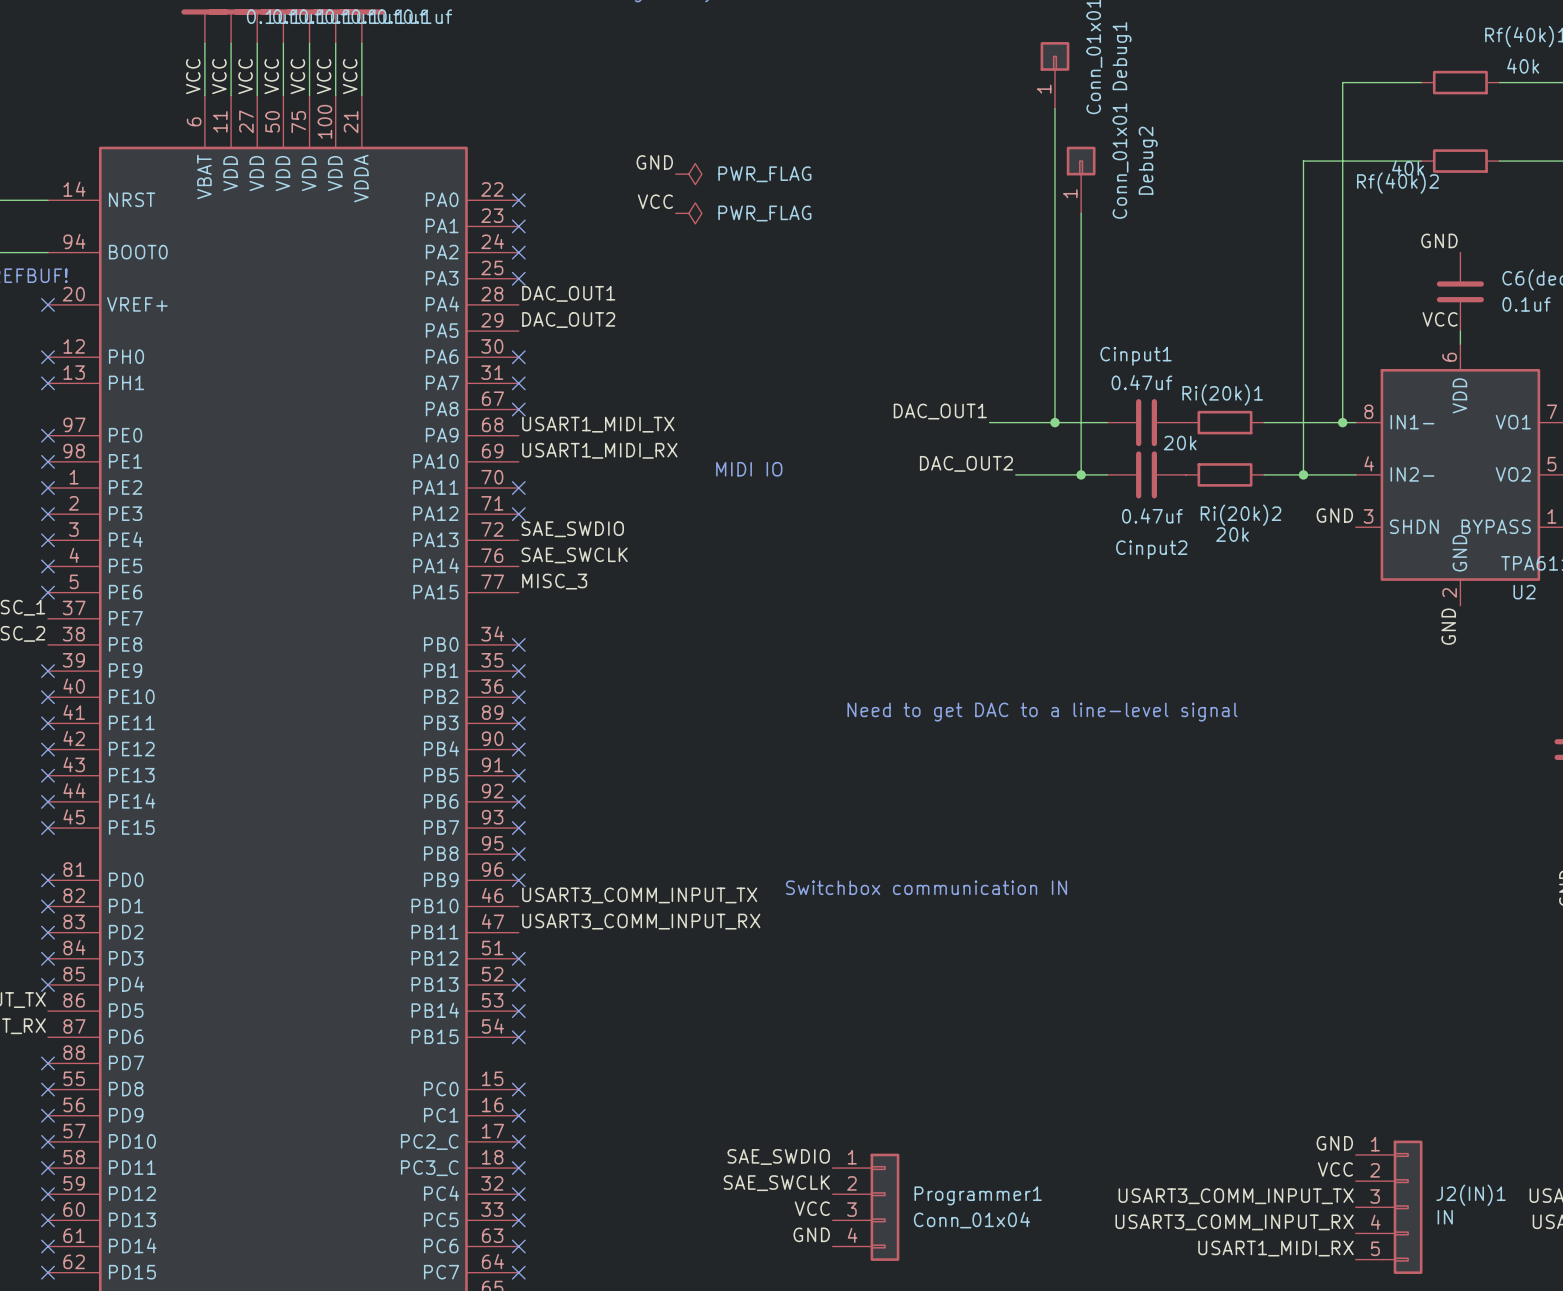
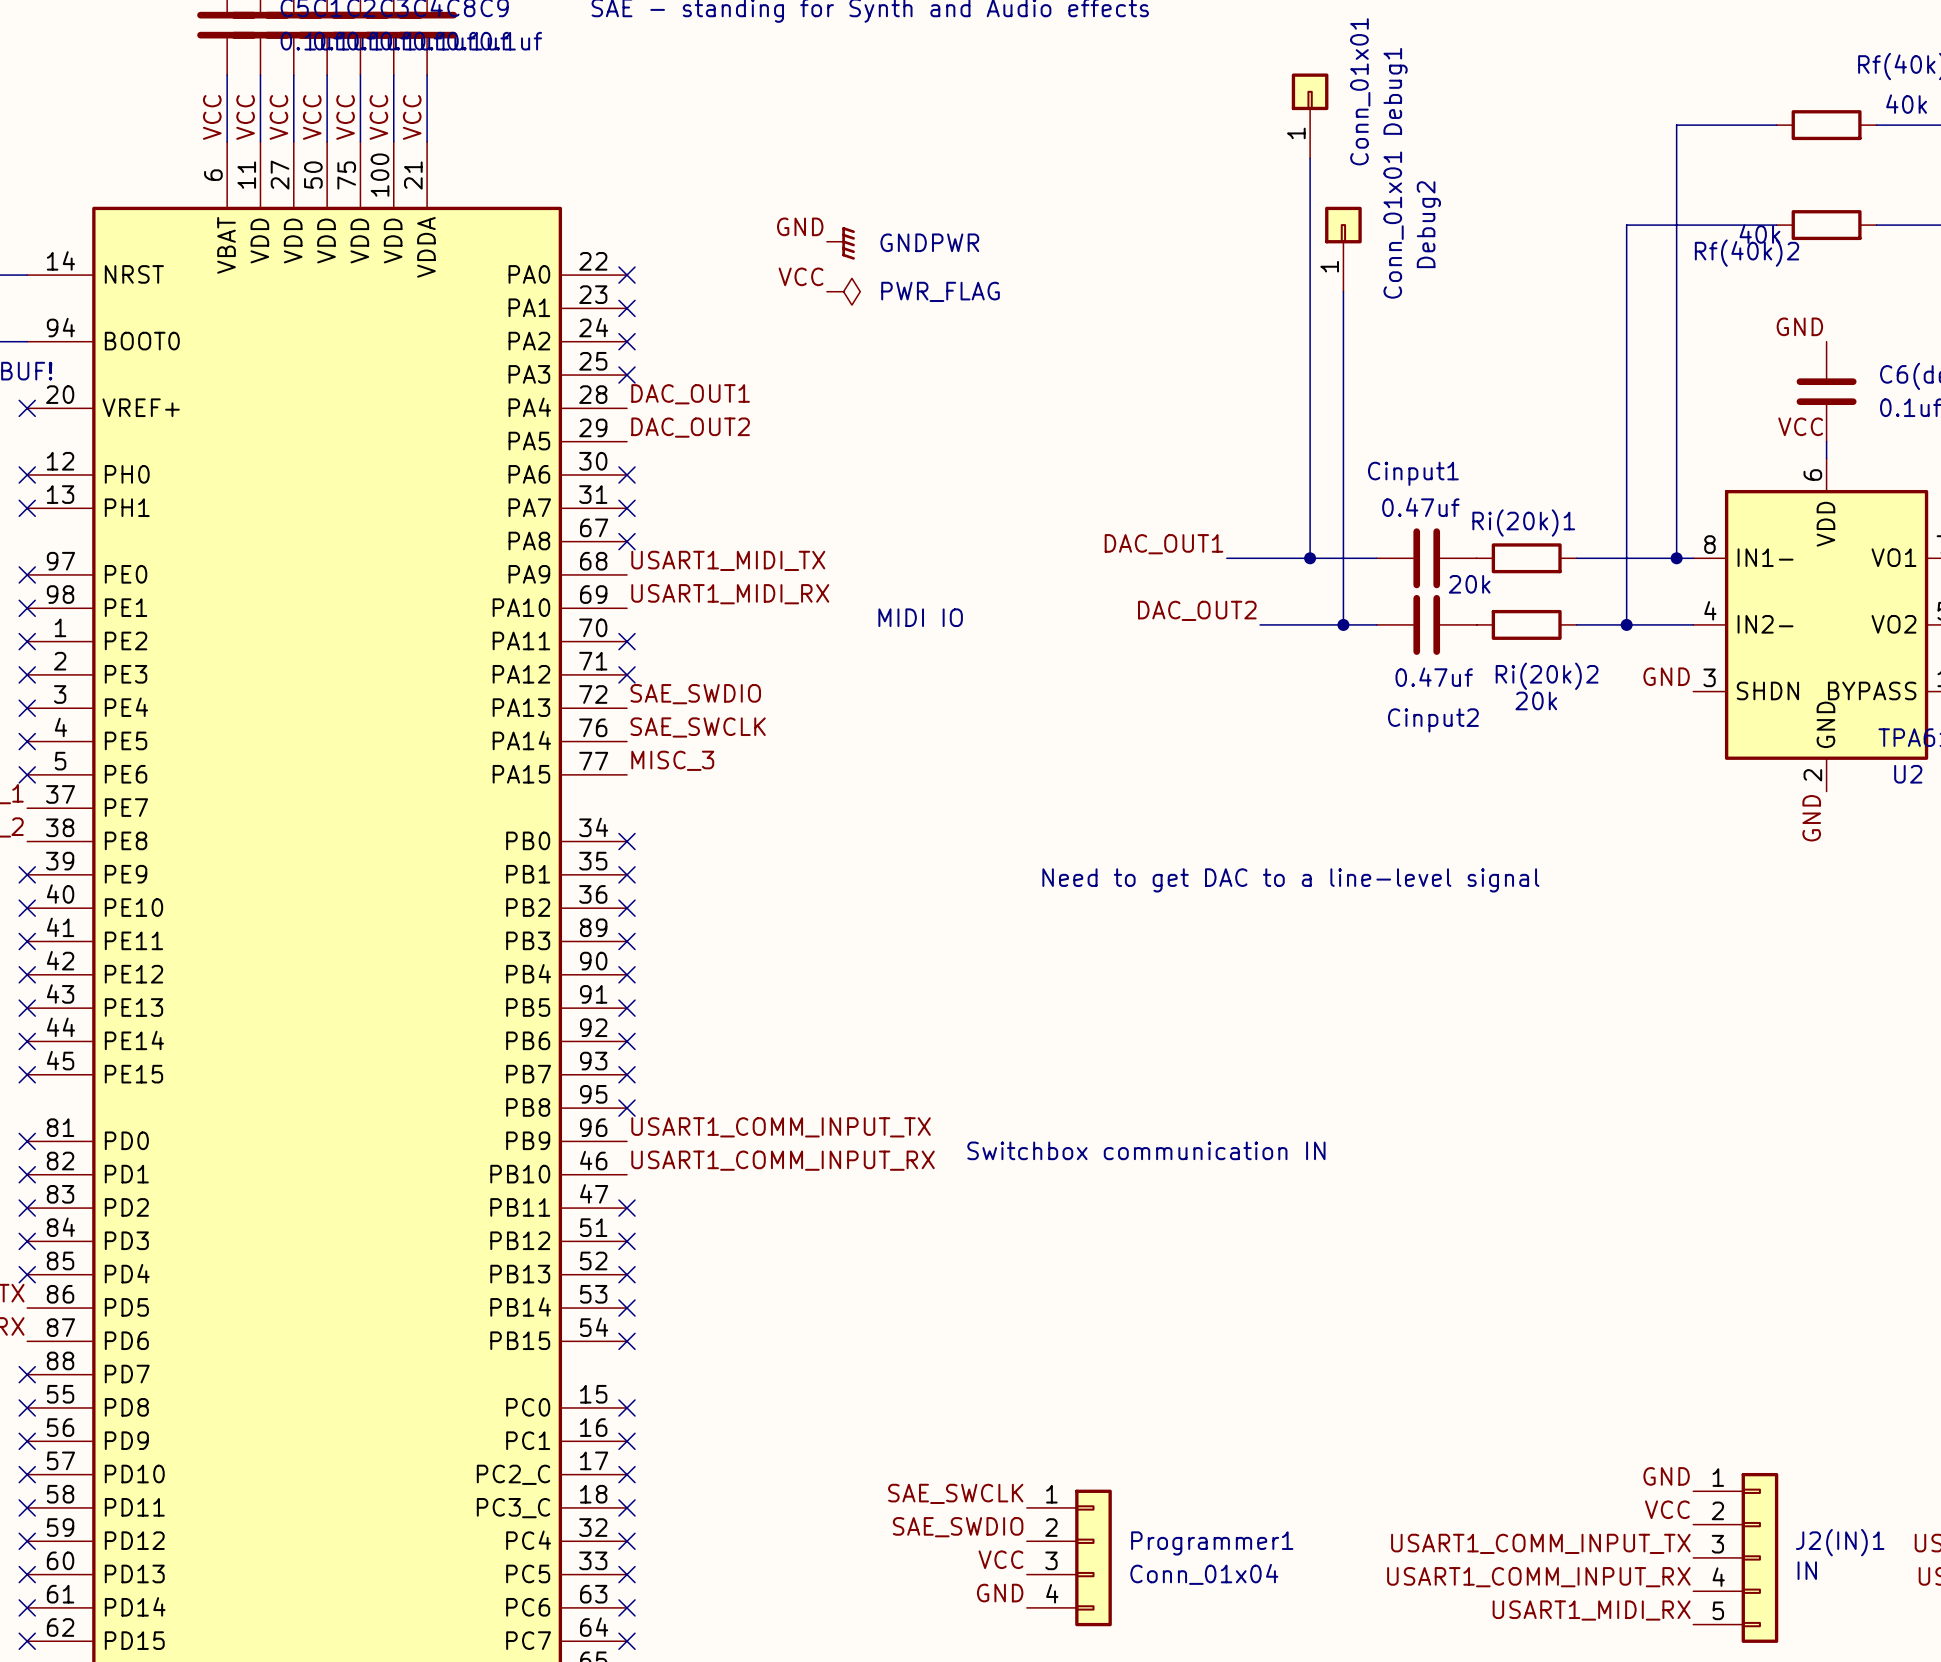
power symbol: PWR_FLAG (688, 174) -> GNDPWR (840, 243)
text position: Need to get DAC to a line-level signal (1042, 712) -> Need to get DAC to a line-level signal (1290, 880)
label: none -> USART1_COMM_INPUT_TX (781, 1127)
no-connect mark position: (518, 880) -> (627, 1208)
label: USART3_COMM_INPUT_TX (639, 895) -> USART1_COMM_INPUT_RX (783, 1160)
label: USART3_COMM_INPUT_RX (641, 921) -> none
label: SAE_SWDIO (778, 1157) -> SAE_SWCLK (955, 1493)
label: SAE_SWCLK (776, 1183) -> SAE_SWDIO (958, 1527)
label: USART3_COMM_INPUT_TX (1236, 1196) -> USART1_COMM_INPUT_TX (1540, 1543)
label: USART3_COMM_INPUT_RX (1234, 1222) -> USART1_COMM_INPUT_RX (1538, 1577)

